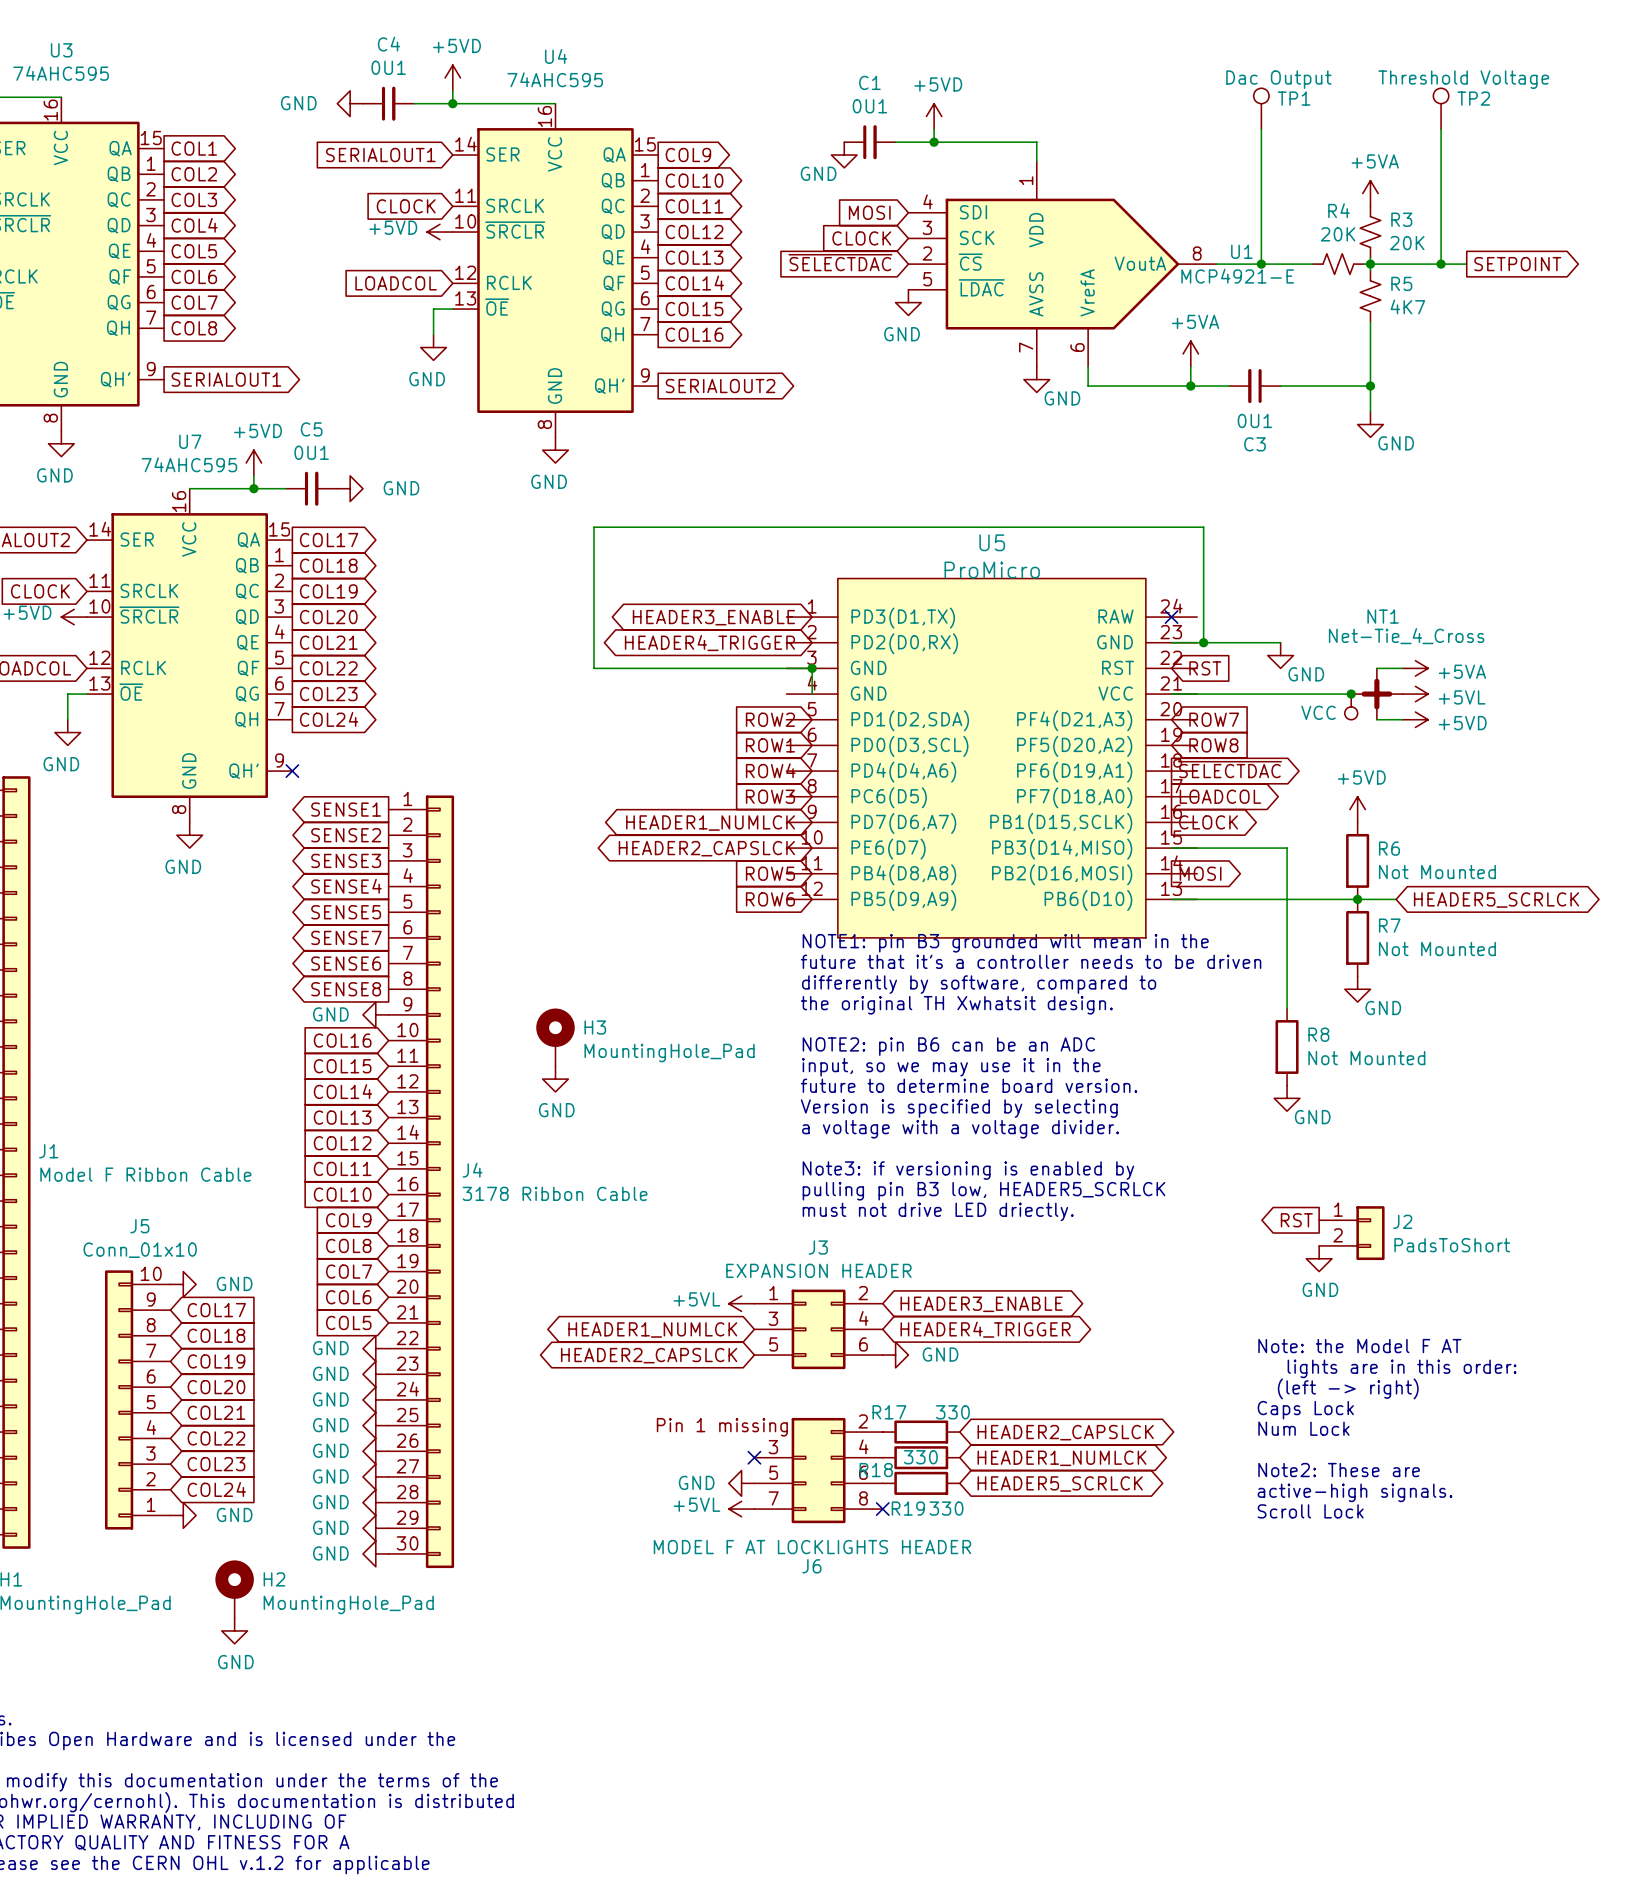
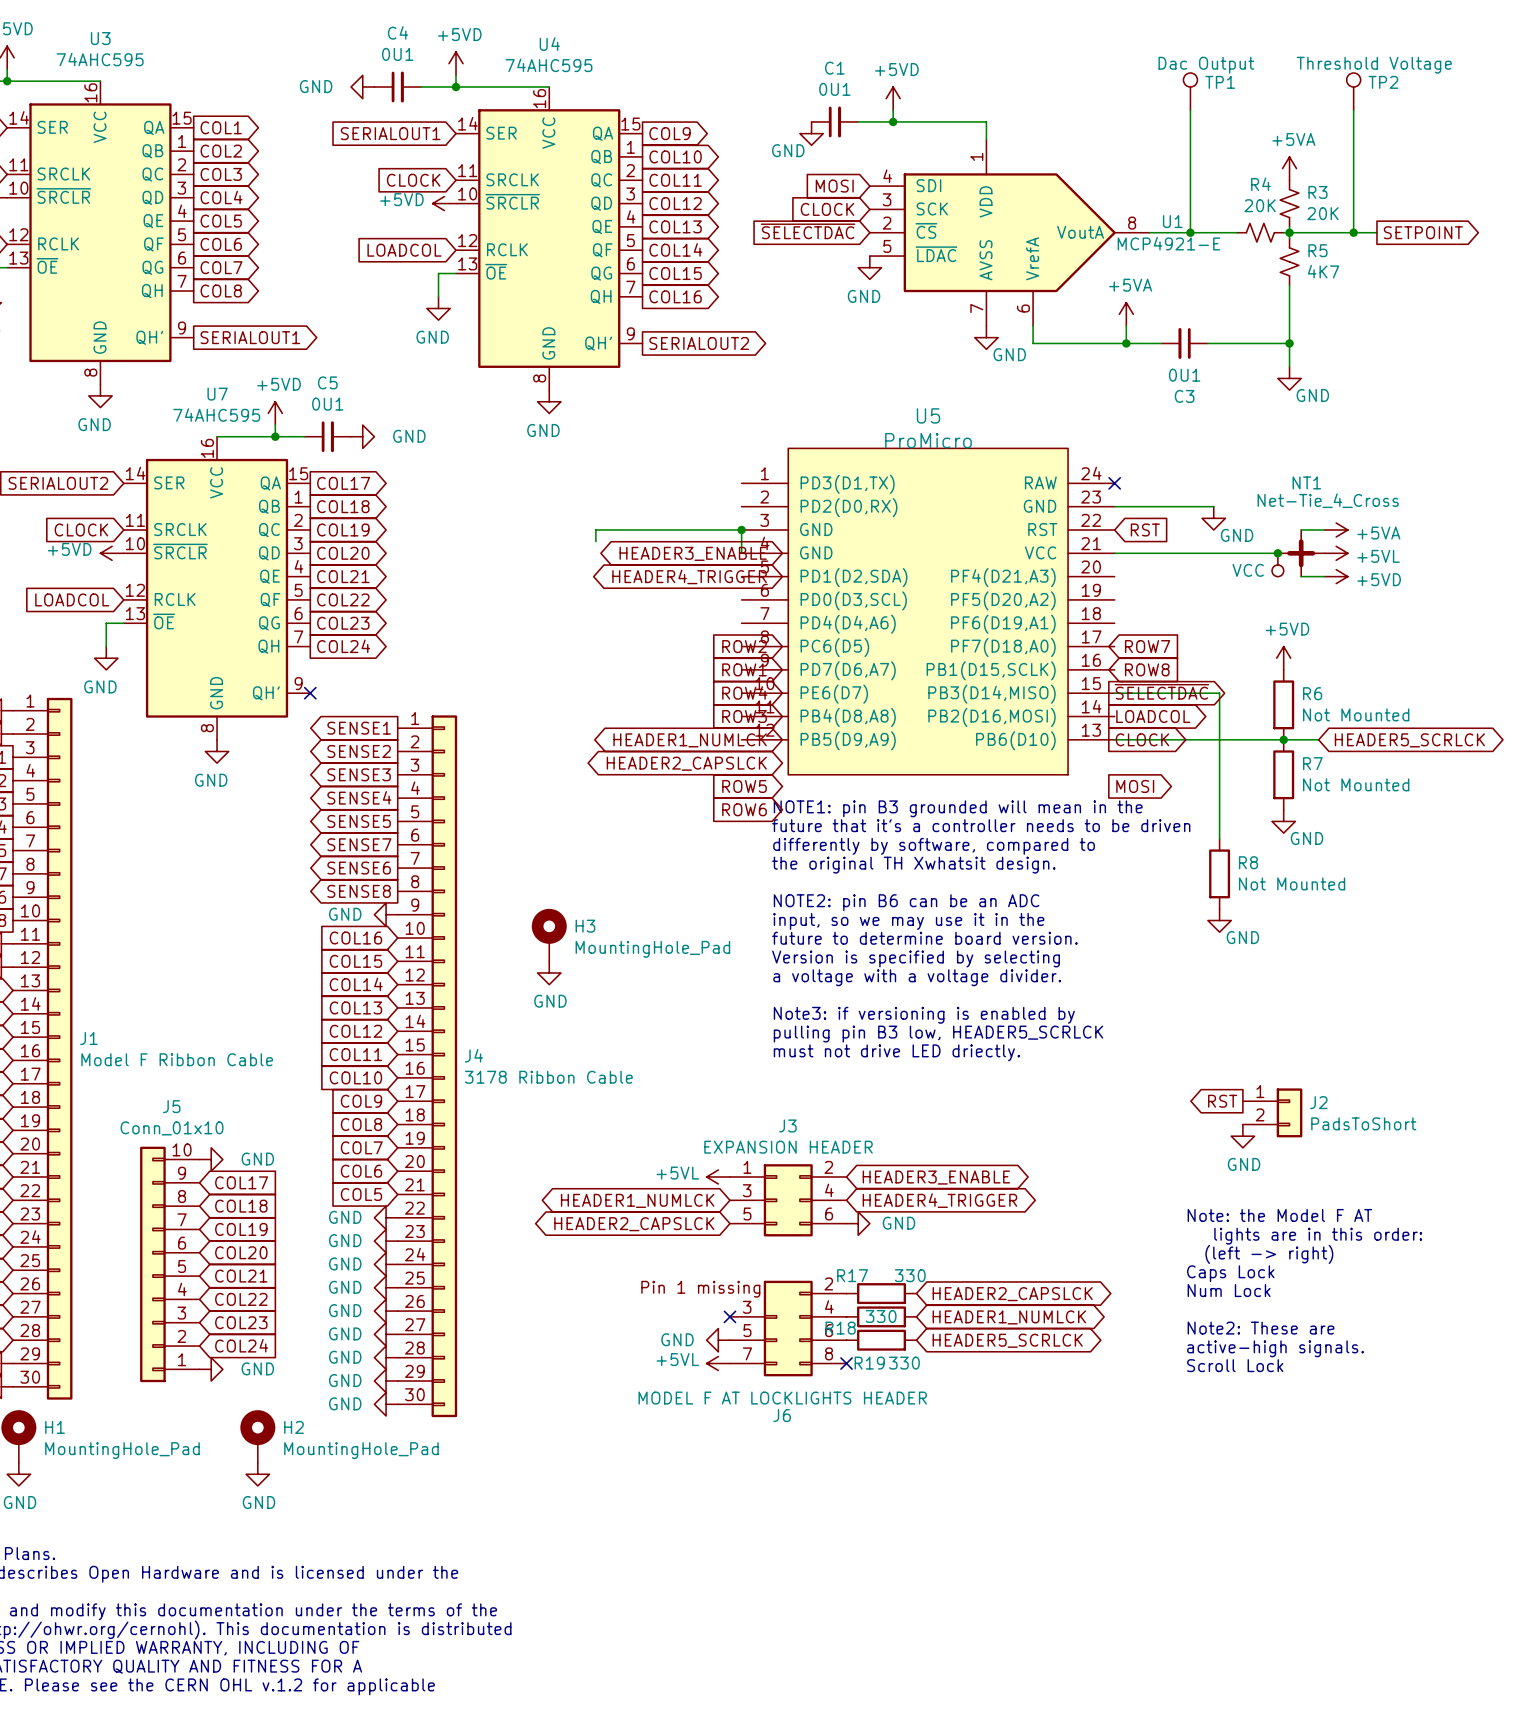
no-connect mark: none -> (1114, 483)
junction: none -> (741, 529)
wire: none -> (595, 541) (595, 529) (741, 529) (741, 553)
no-connect mark: (1171, 617) -> none
junction: none -> (1277, 553)
wire: (1171, 642) (1280, 642) -> (1114, 506) (1213, 506)
wire: (1203, 642) (1203, 527) (593, 527) (593, 668) (812, 668) (812, 694) -> none
junction: (1203, 642) -> none
power symbol: none -> +5VD (1336, 576)
power symbol position: GND (1280, 655) -> GND (1213, 518)
junction: (812, 668) -> none
global label position: RST (1205, 668) -> RST (1145, 529)
wire: (1376, 668) (1402, 668) -> (1301, 529) (1324, 529)
power symbol position: +5VA (1415, 668) -> +5VA (1336, 529)
wire: (1171, 694) (1351, 694) -> (1114, 553) (1277, 553)
junction: (1351, 694) -> none
NT1 position: (1376, 694) -> (1301, 553)
power symbol position: +5VL (1415, 694) -> +5VL (1336, 553)
power symbol position: VCC (1351, 706) -> VCC (1277, 564)
wire: (1376, 719) (1402, 719) -> (1301, 576) (1324, 576)
power symbol: +5VD (1415, 719) -> none
power symbol: none -> +5VD (1283, 658)
U5 position: (991, 758) -> (928, 611)
power symbol: +5VD (1357, 809) -> none
junction: none -> (1283, 739)
wire: (1171, 848) (1287, 848) (1287, 1008) -> (1114, 693) (1219, 693) (1219, 838)
R6 position: (1357, 860) -> (1283, 704)
wire: (1171, 899) (1396, 899) -> (1114, 739) (1318, 739)
junction: (1357, 899) -> none
global label position: HEADER5_SCRLCK (1496, 900) -> HEADER5_SCRLCK (1409, 740)
power symbol: none -> GND (1283, 821)
R7 position: (1357, 937) -> (1283, 774)
text position: NOTE1: pin B3 grounded will mean in the (1005, 943) -> NOTE1: pin B3 grounded will mean in the (958, 808)
text position: future that it's a controller needs to be driven (1031, 961) -> future that it's a controller needs to be driven (981, 825)
text position: differently by software, compared to (979, 984) -> differently by software, compared to (934, 846)
power symbol: GND (1357, 989) -> none
text position: the original TH Xwhatsit design. (956, 1005) -> the original TH Xwhatsit design. (913, 865)
power symbol: none -> GND (1219, 920)
text position: NOTE2: pin B6 can be an ADC (948, 1046) -> NOTE2: pin B6 can be an ADC (906, 902)
R8 position: (1287, 1047) -> (1219, 873)
text position: input, so we may use it in the (951, 1067) -> input, so we may use it in the (908, 921)
text position: future to determine board version. (969, 1085) -> future to determine board version. (924, 938)
power symbol: GND (1287, 1098) -> none
text position: Version is specified by selecting (959, 1108) -> Version is specified by selecting (916, 958)
text position: a voltage with a voltage divider. (960, 1129) -> a voltage with a voltage divider. (917, 977)
text position: Note3: if versioning is enabled by (968, 1170) -> Note3: if versioning is enabled by (924, 1015)
text position: pulling pin B3 low, HEADER5_SCRLCK (984, 1191) -> pulling pin B3 low, HEADER5_SCRLCK (938, 1034)
text position: must not drive LED driectly. (938, 1211) -> must not drive LED driectly. (896, 1052)

